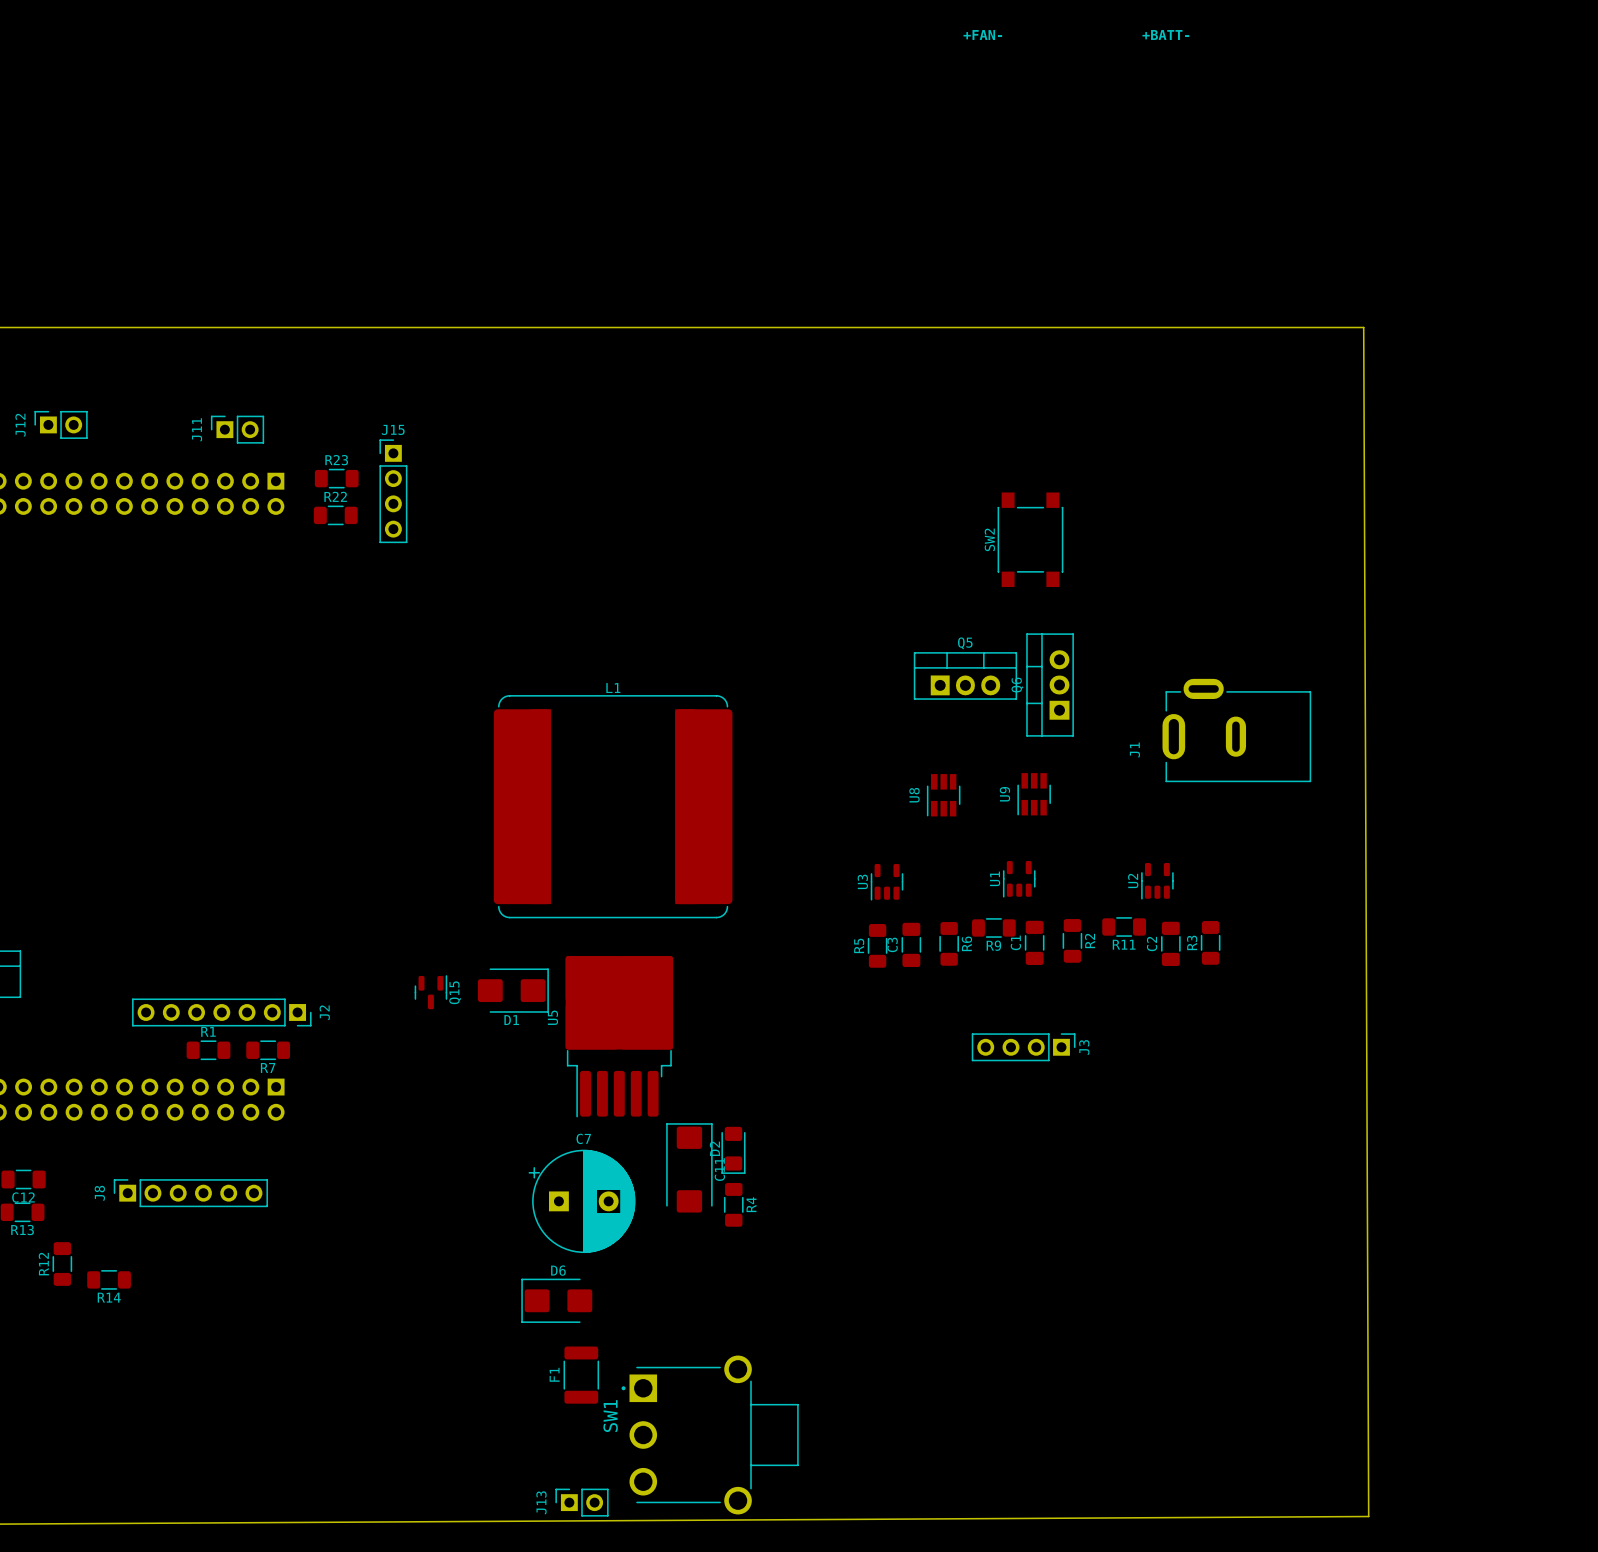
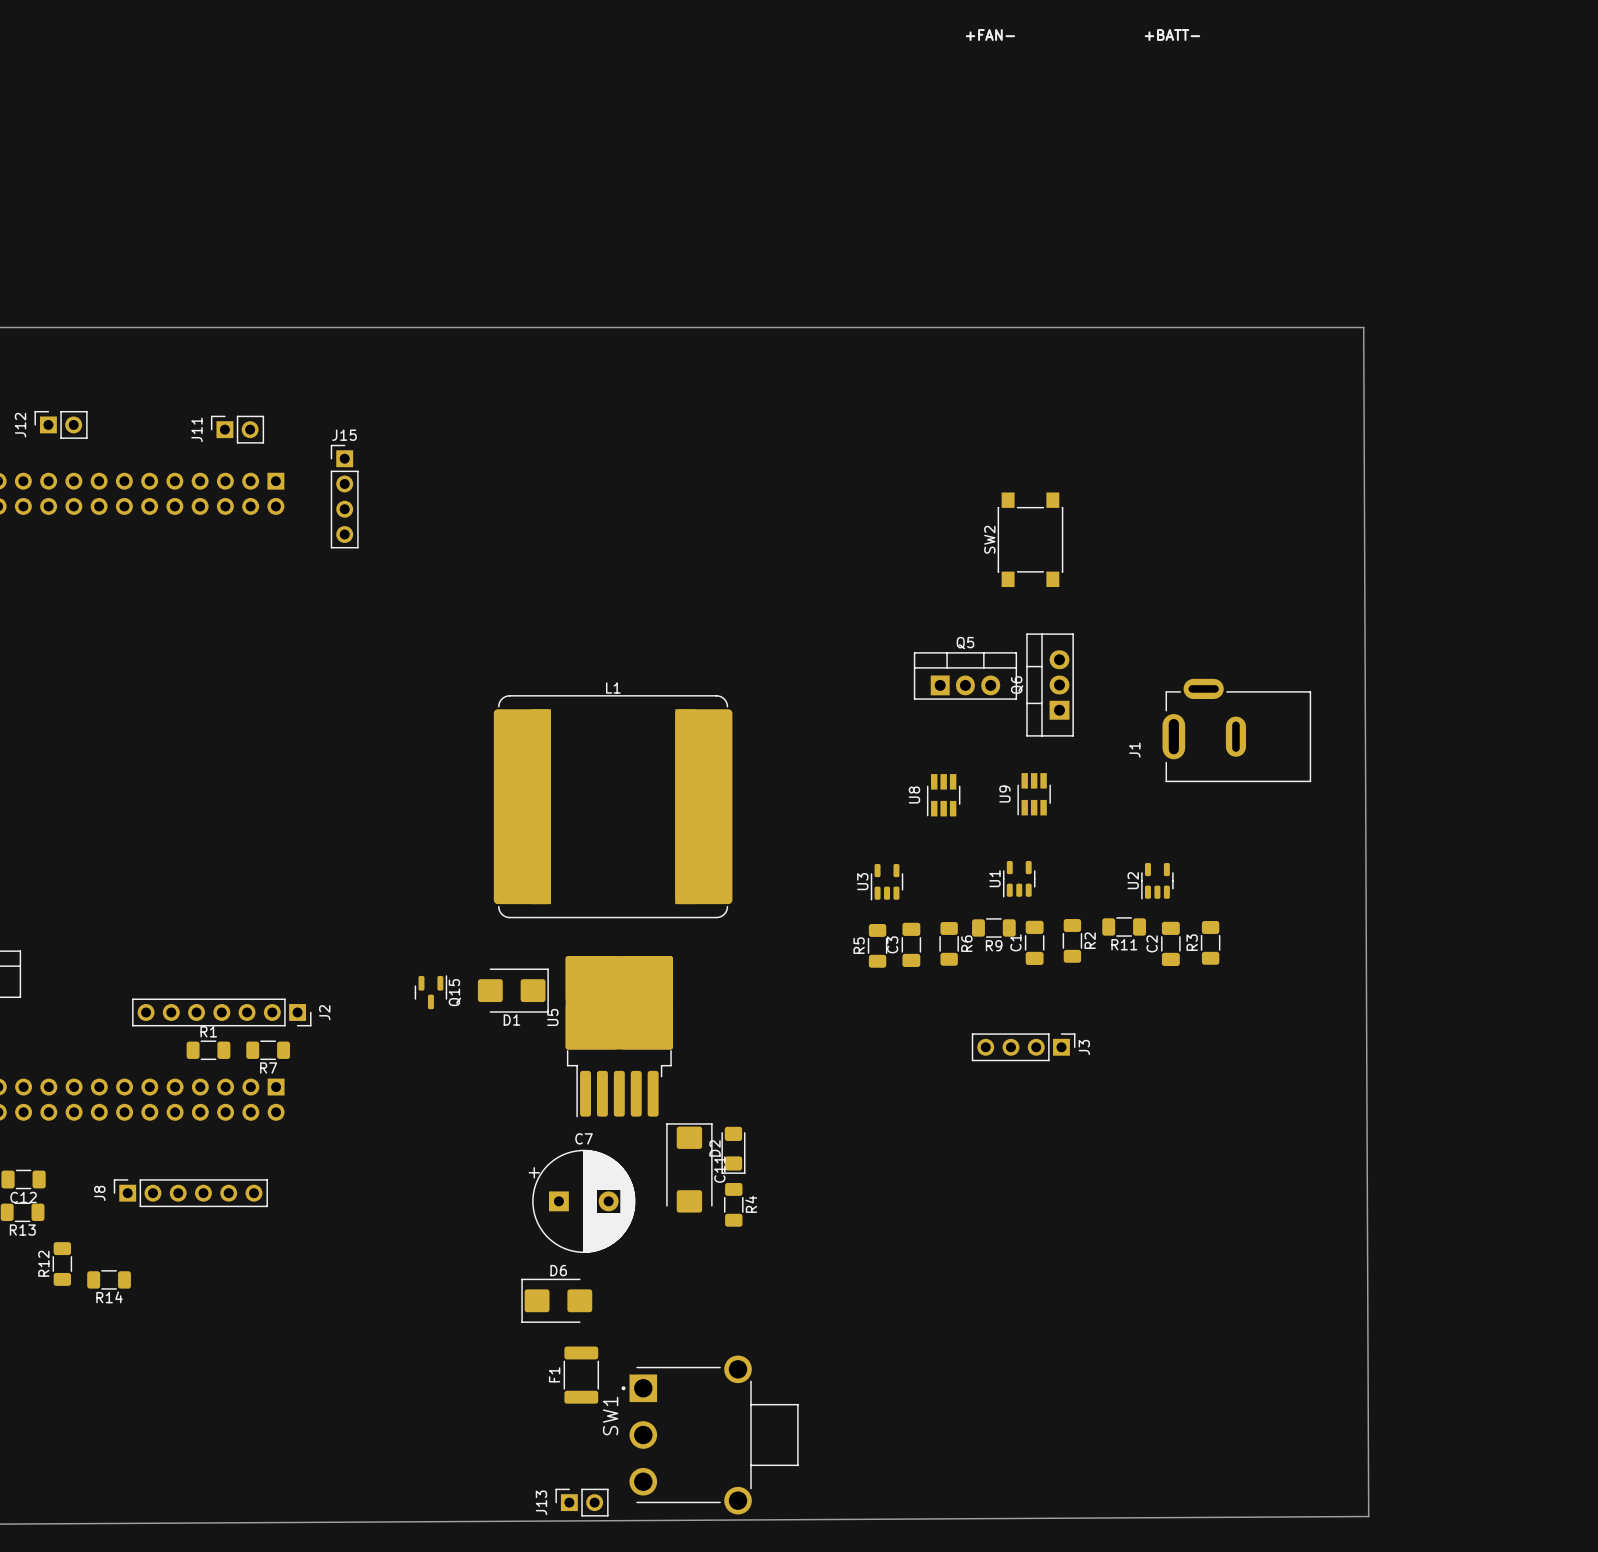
R23: (336, 478) -> none
J15 position: (393, 491) -> (344, 496)
R22: (335, 515) -> none

